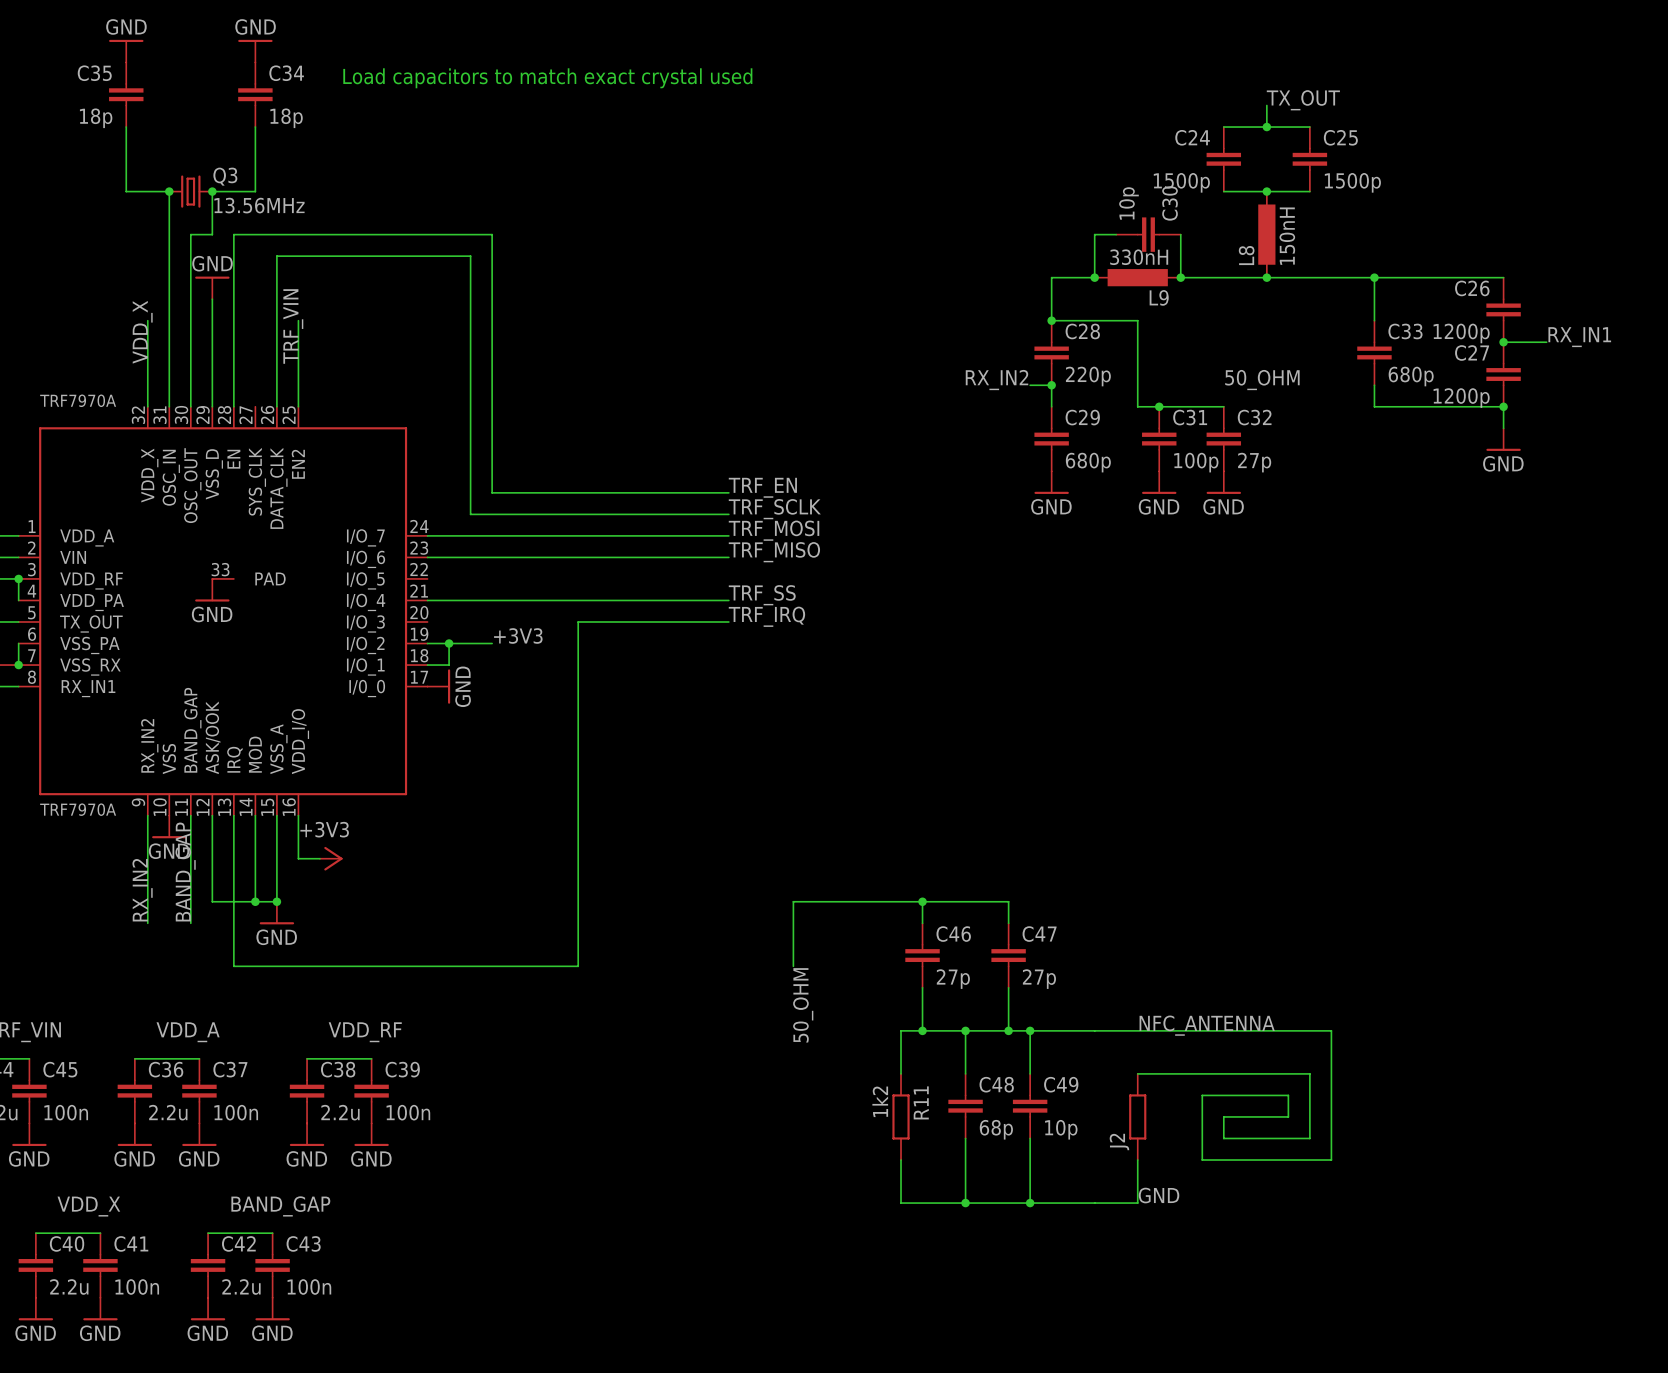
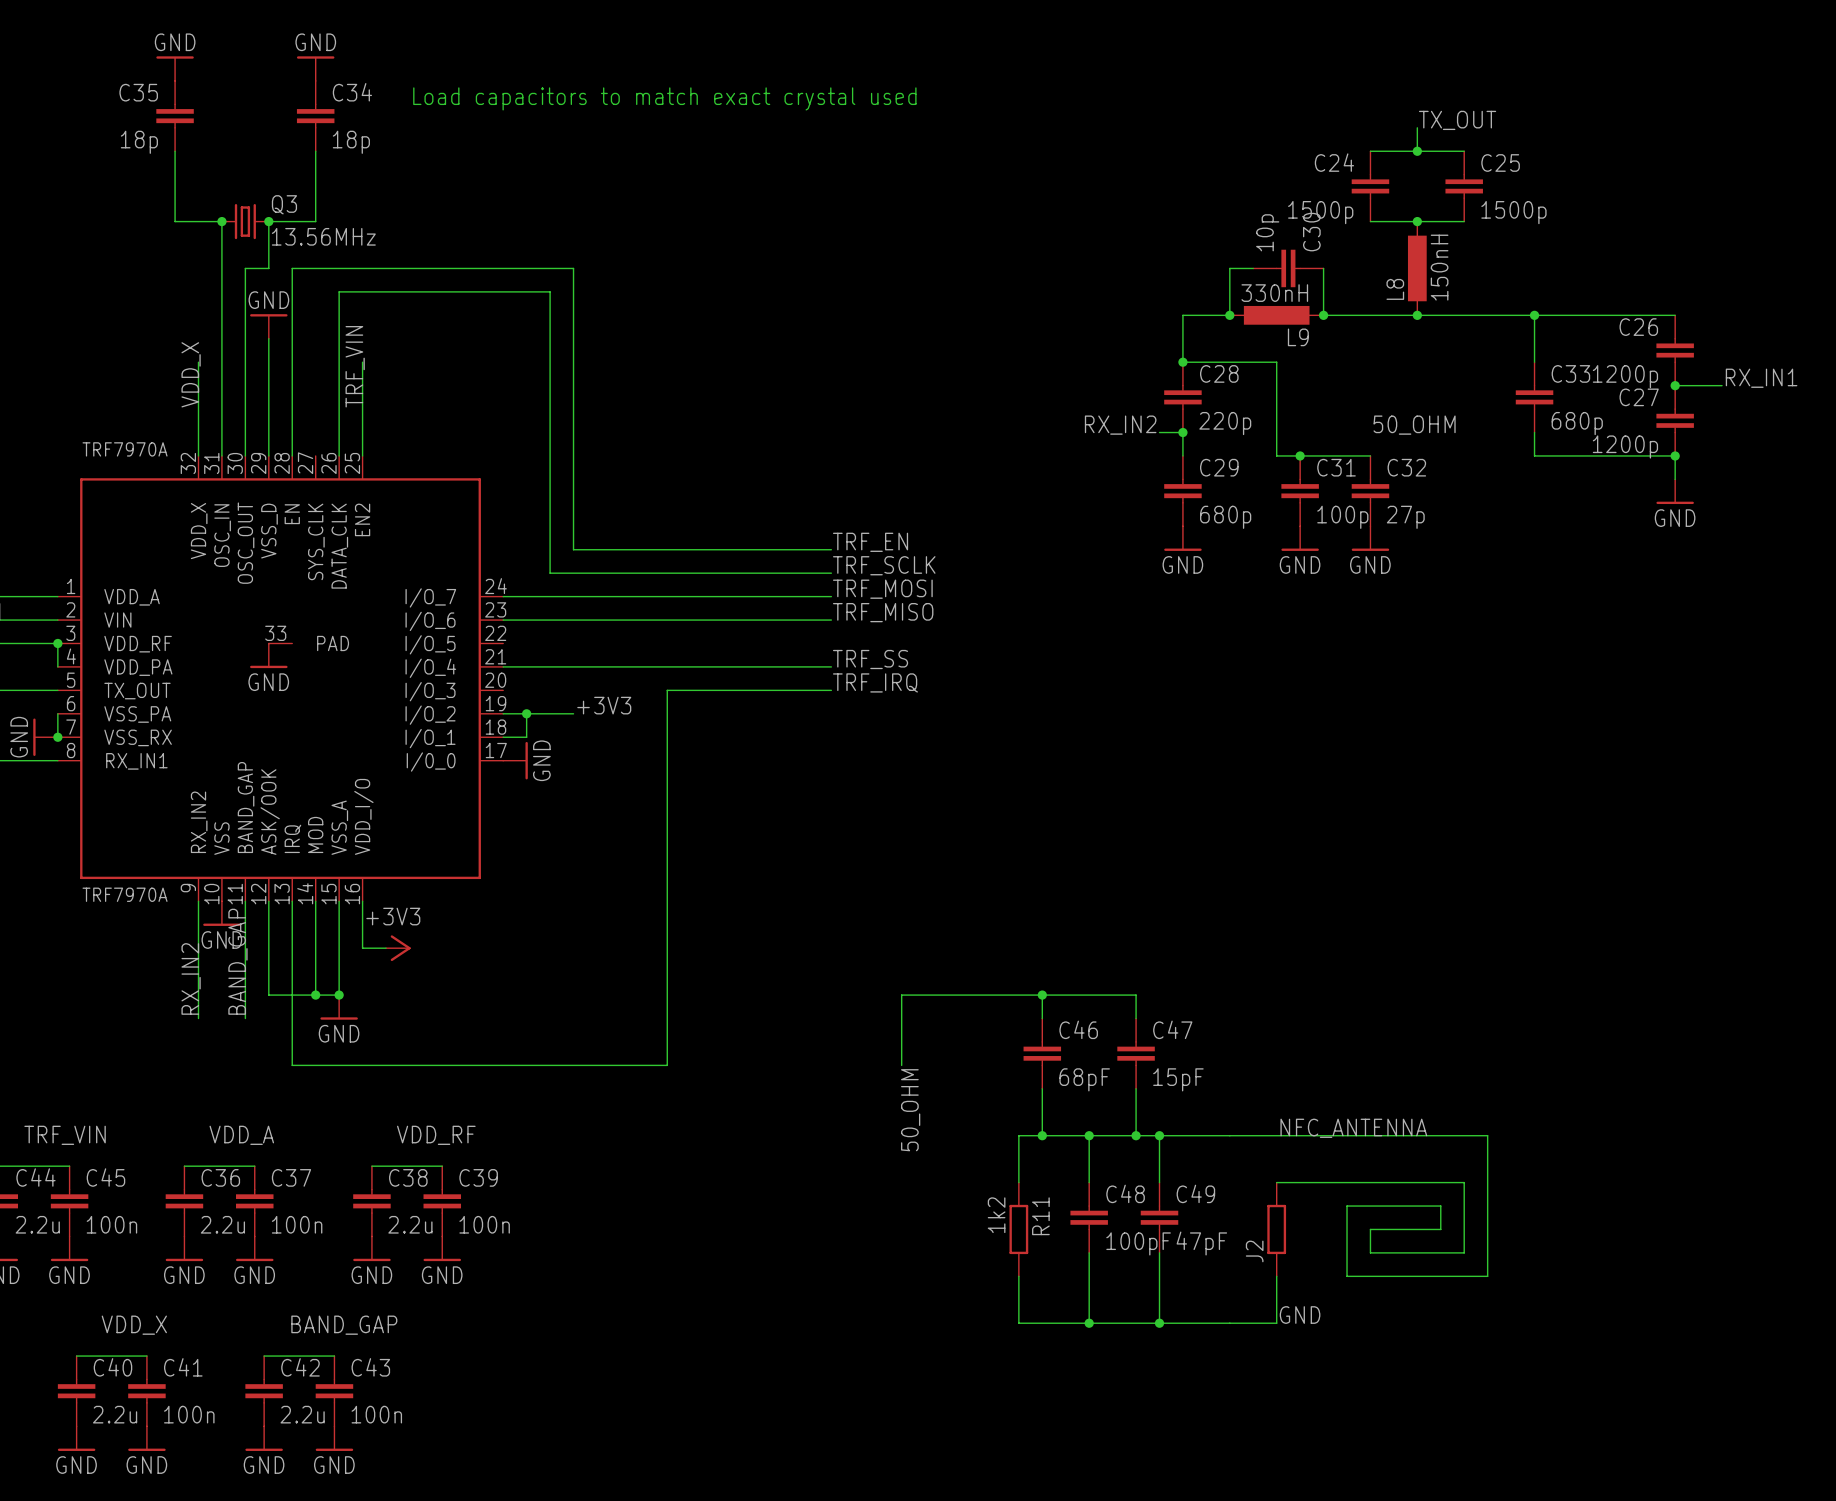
C46 value: 27p (953, 979) -> 68pF (1084, 1079)
C47 value: 27p (1039, 979) -> 15pF (1178, 1079)
C48 value: 68p (996, 1129) -> 100pF (1138, 1243)
C49 value: 10p (1061, 1129) -> 47pF (1201, 1243)

